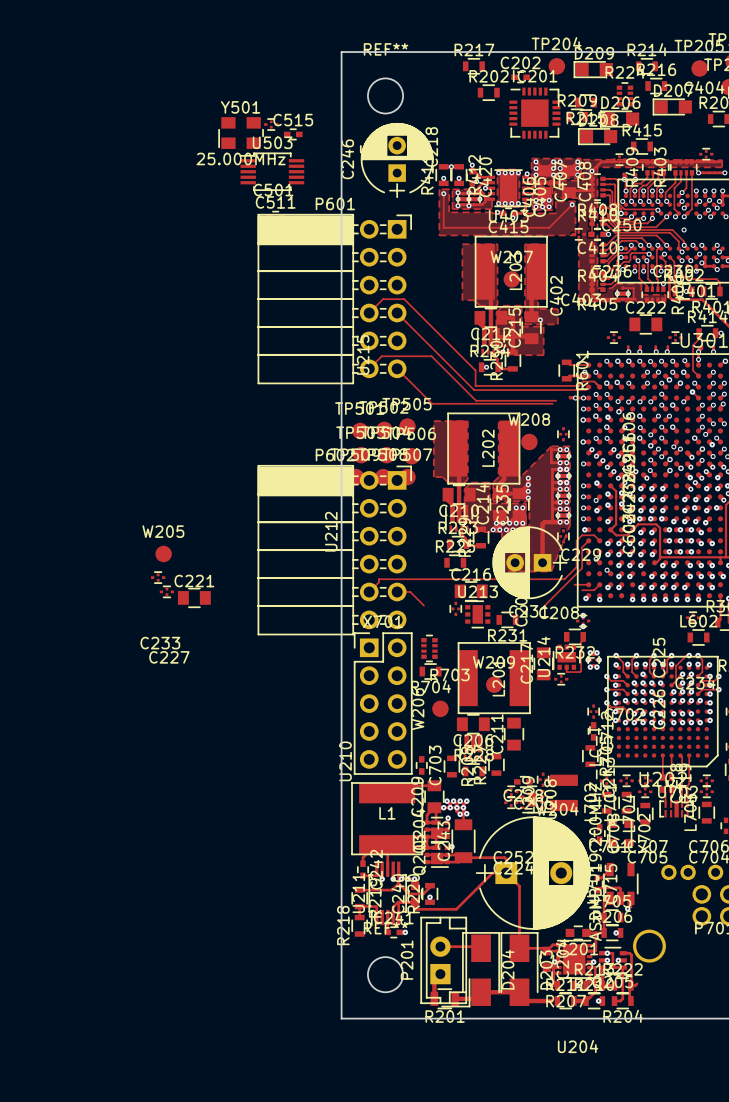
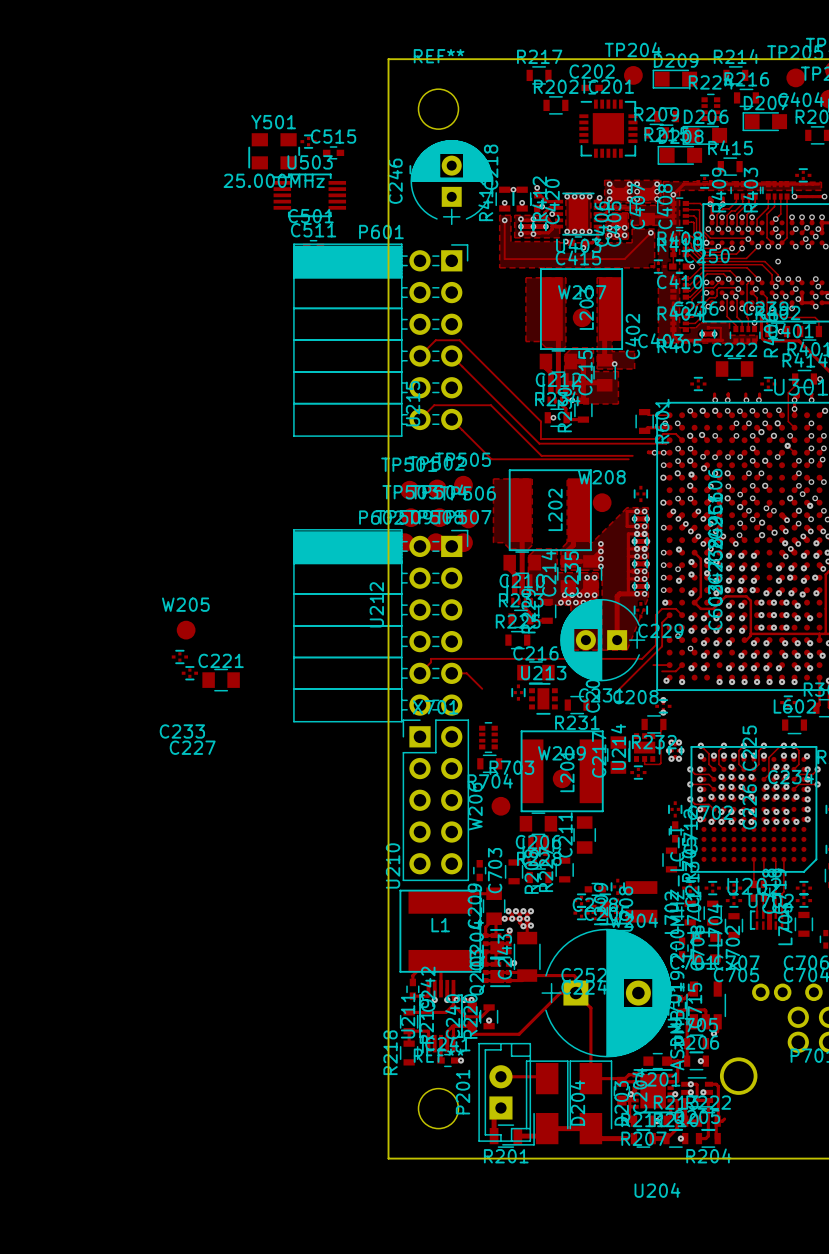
via: none -> (816, 593)

